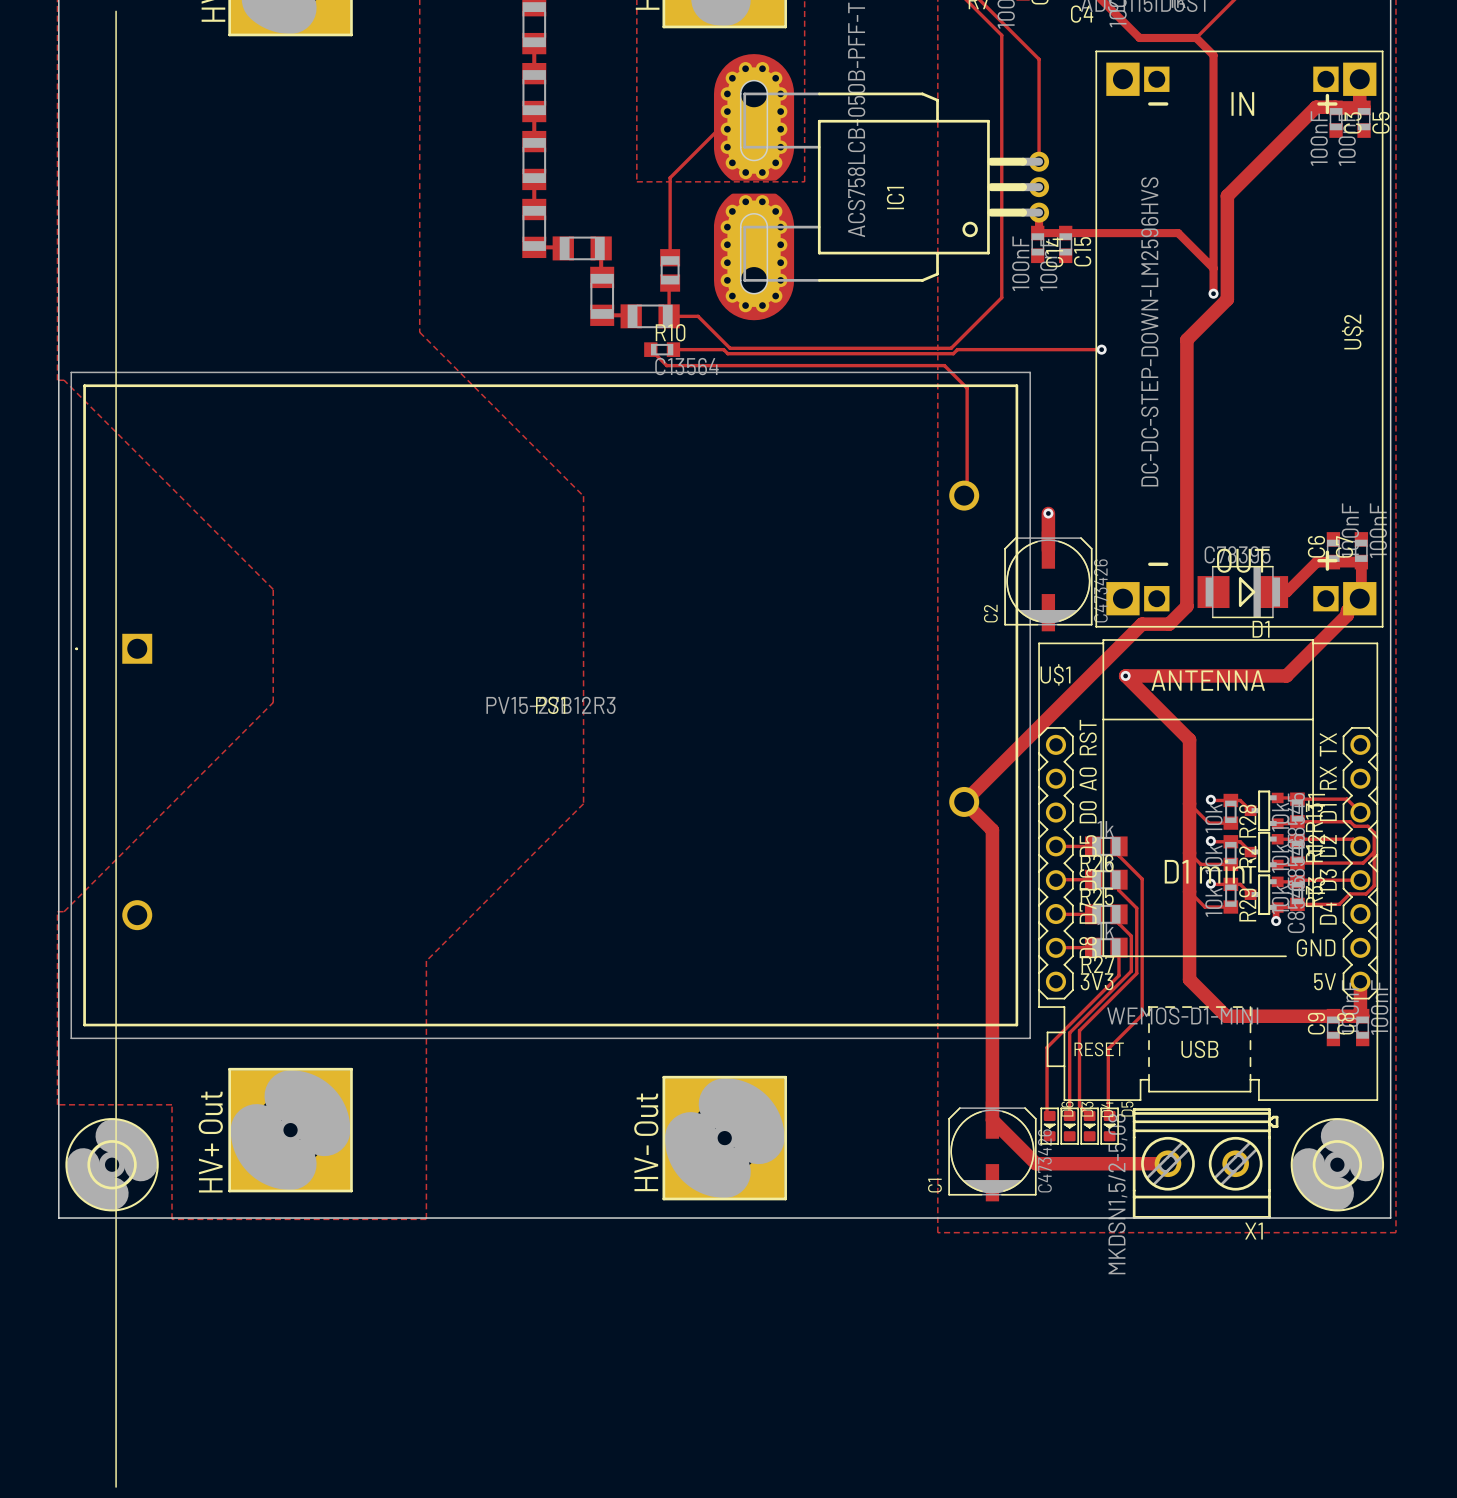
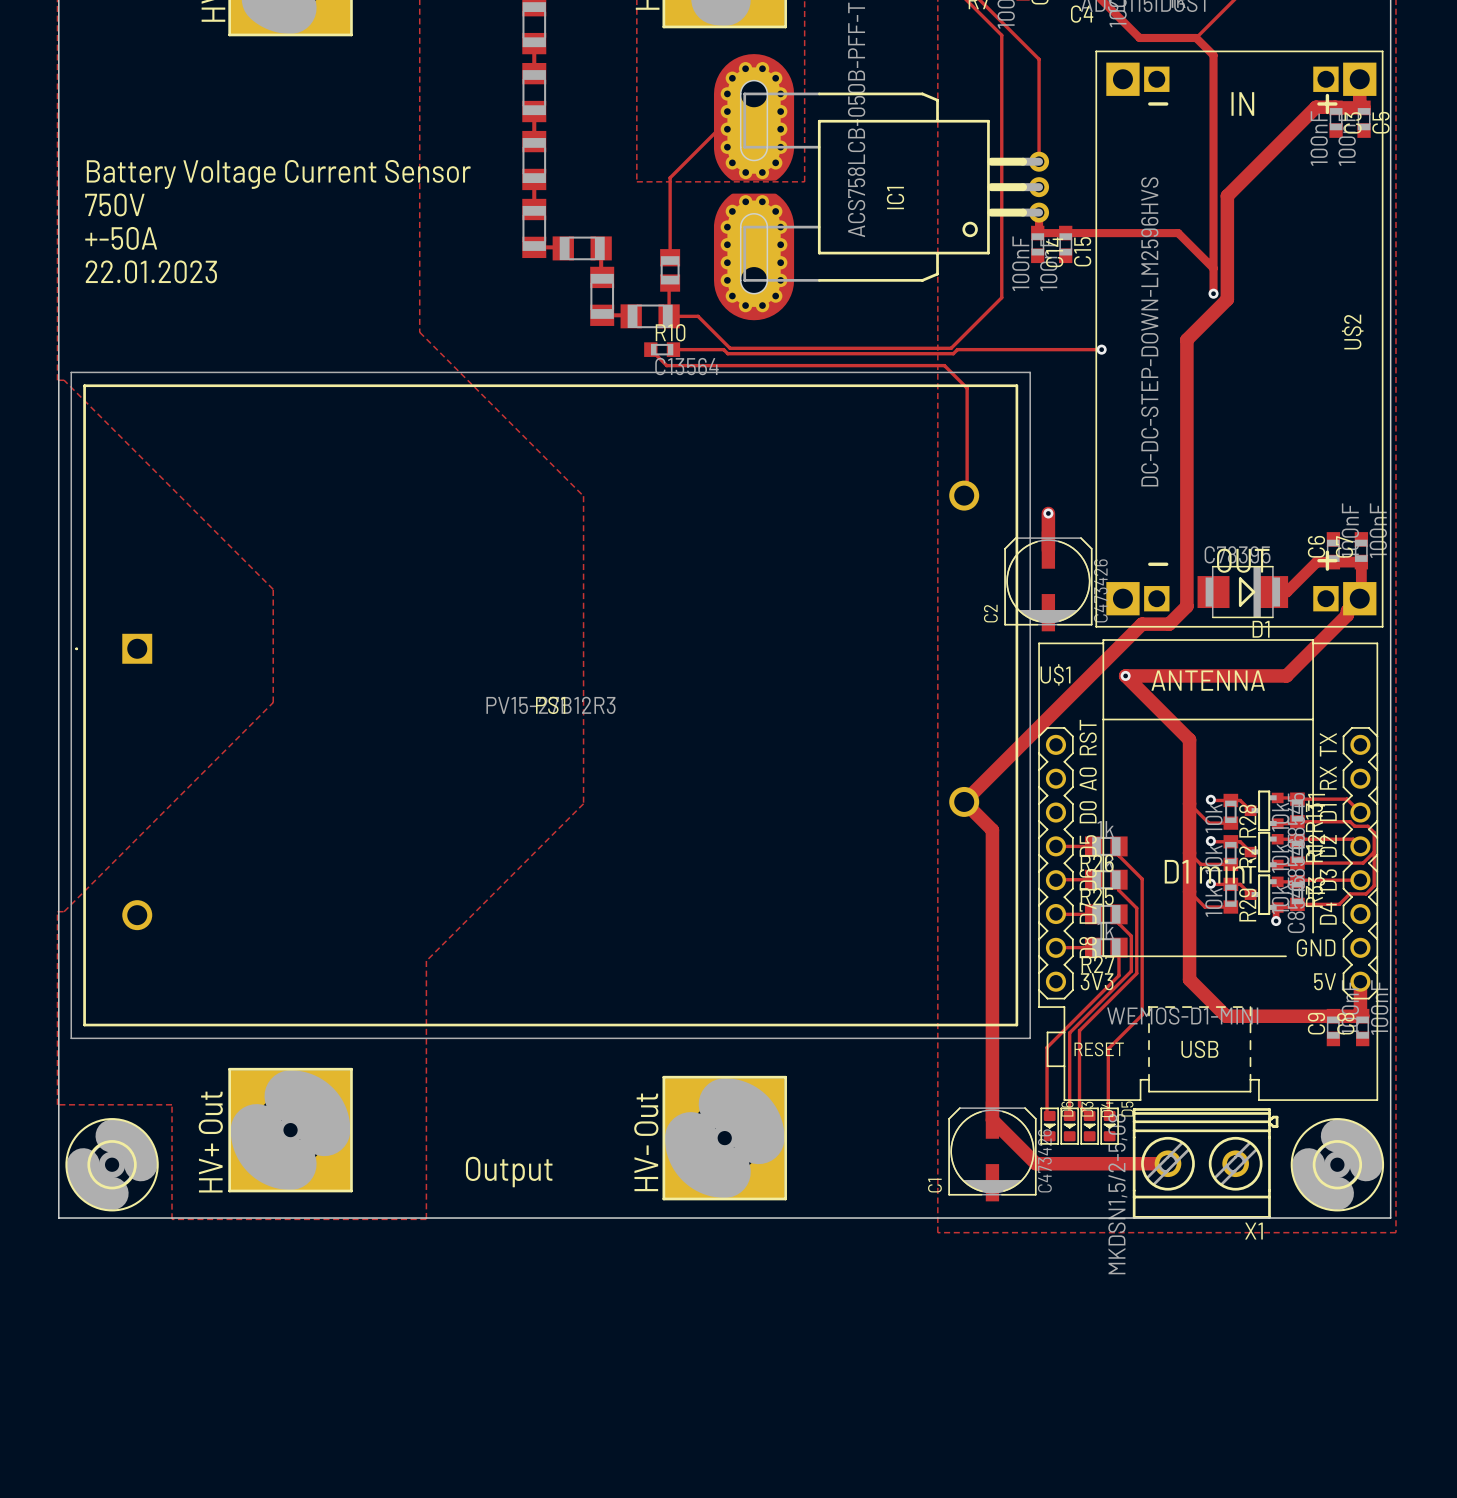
line: (116, 11) (116, 1487) -> none
text: none -> Battery Voltage Current Sensor (278, 174)
text: none -> 750V (114, 204)
text: none -> +-50A (121, 238)
text: none -> 22.01.2023 (151, 271)
text: none -> Output (509, 1172)

